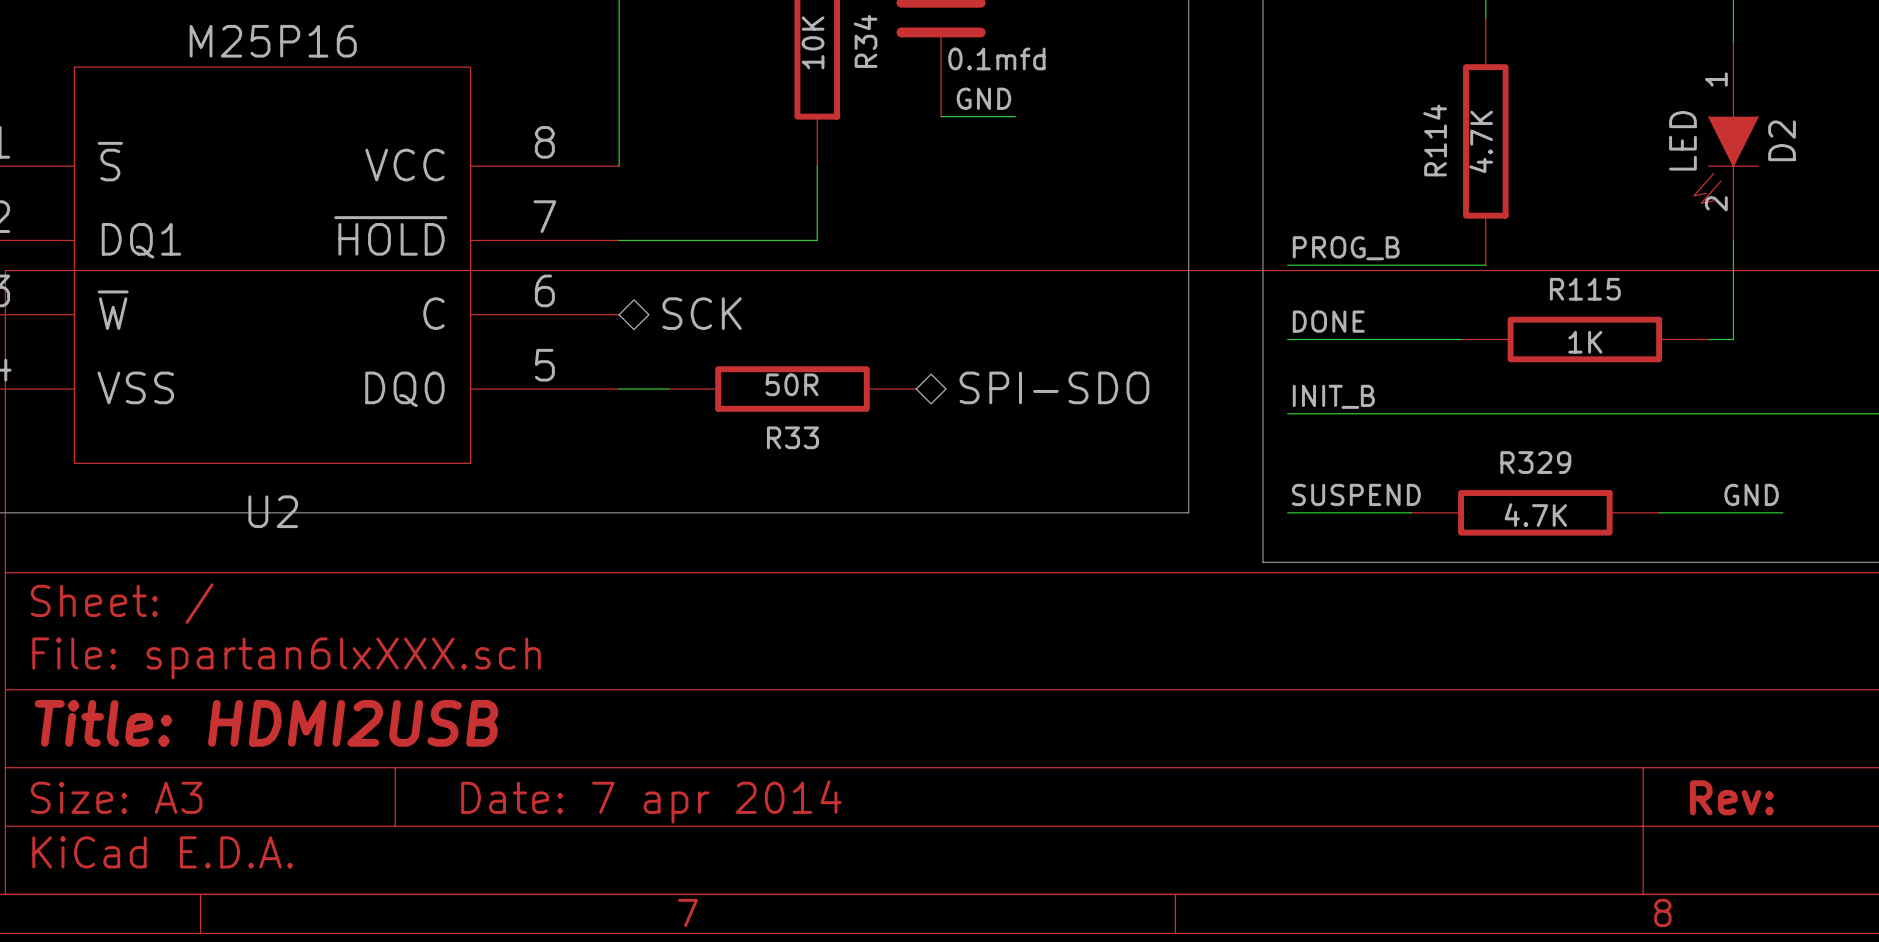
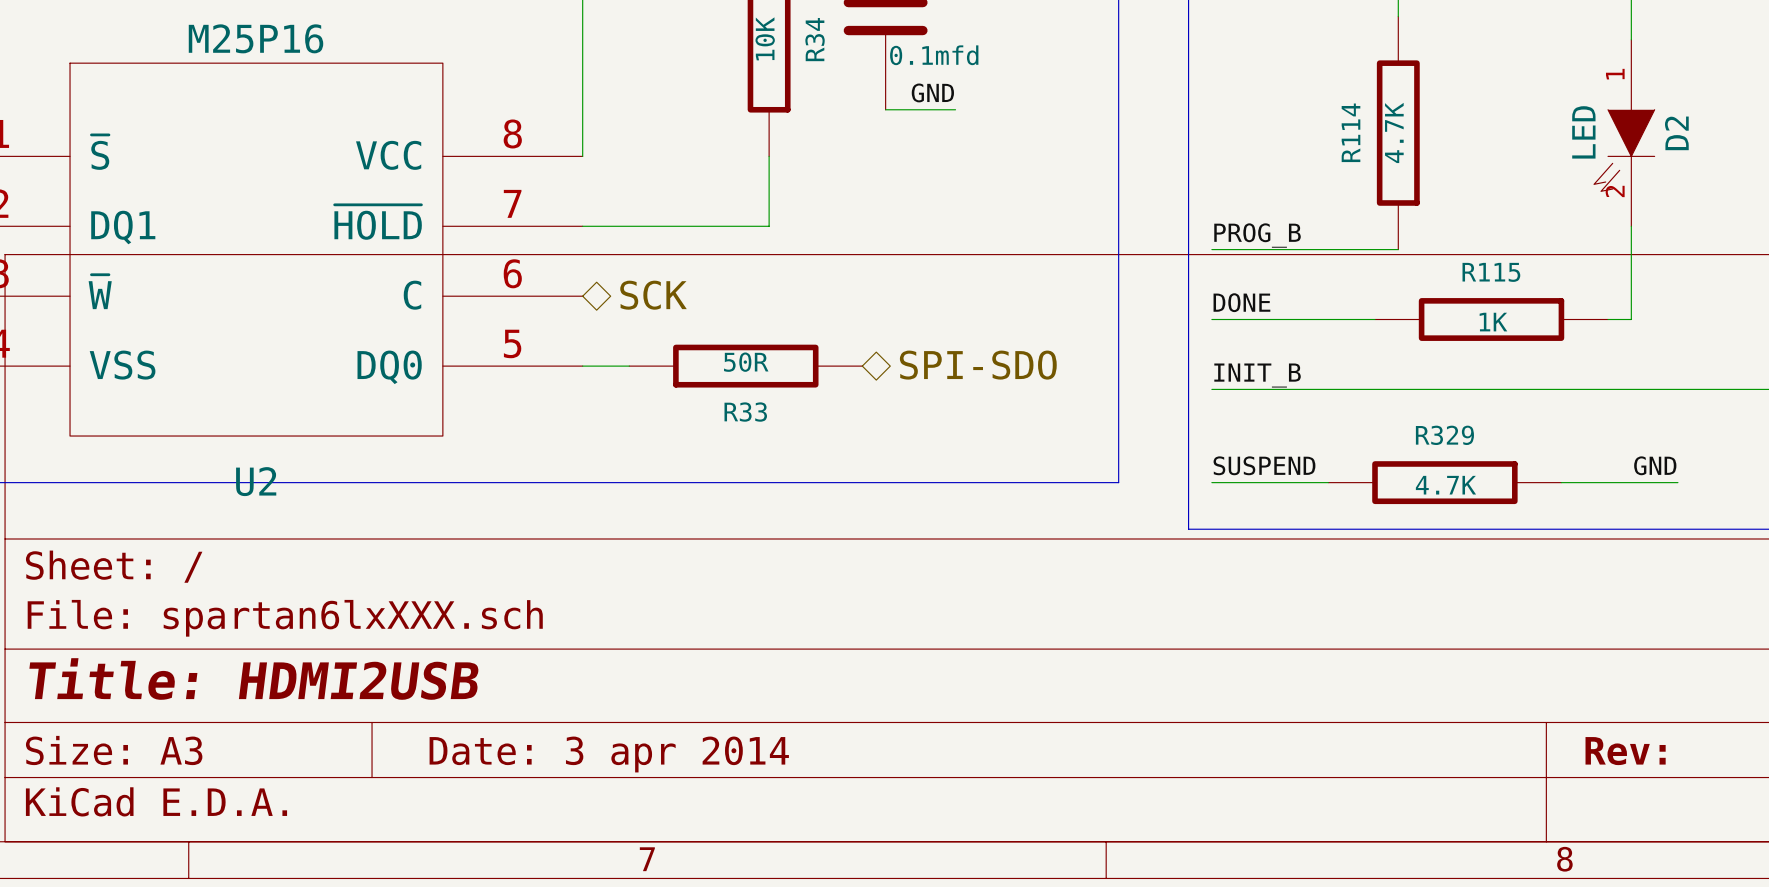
title block: Date: 7 apr 2014 (651, 801) -> Date: 3 apr 2014 (609, 754)

